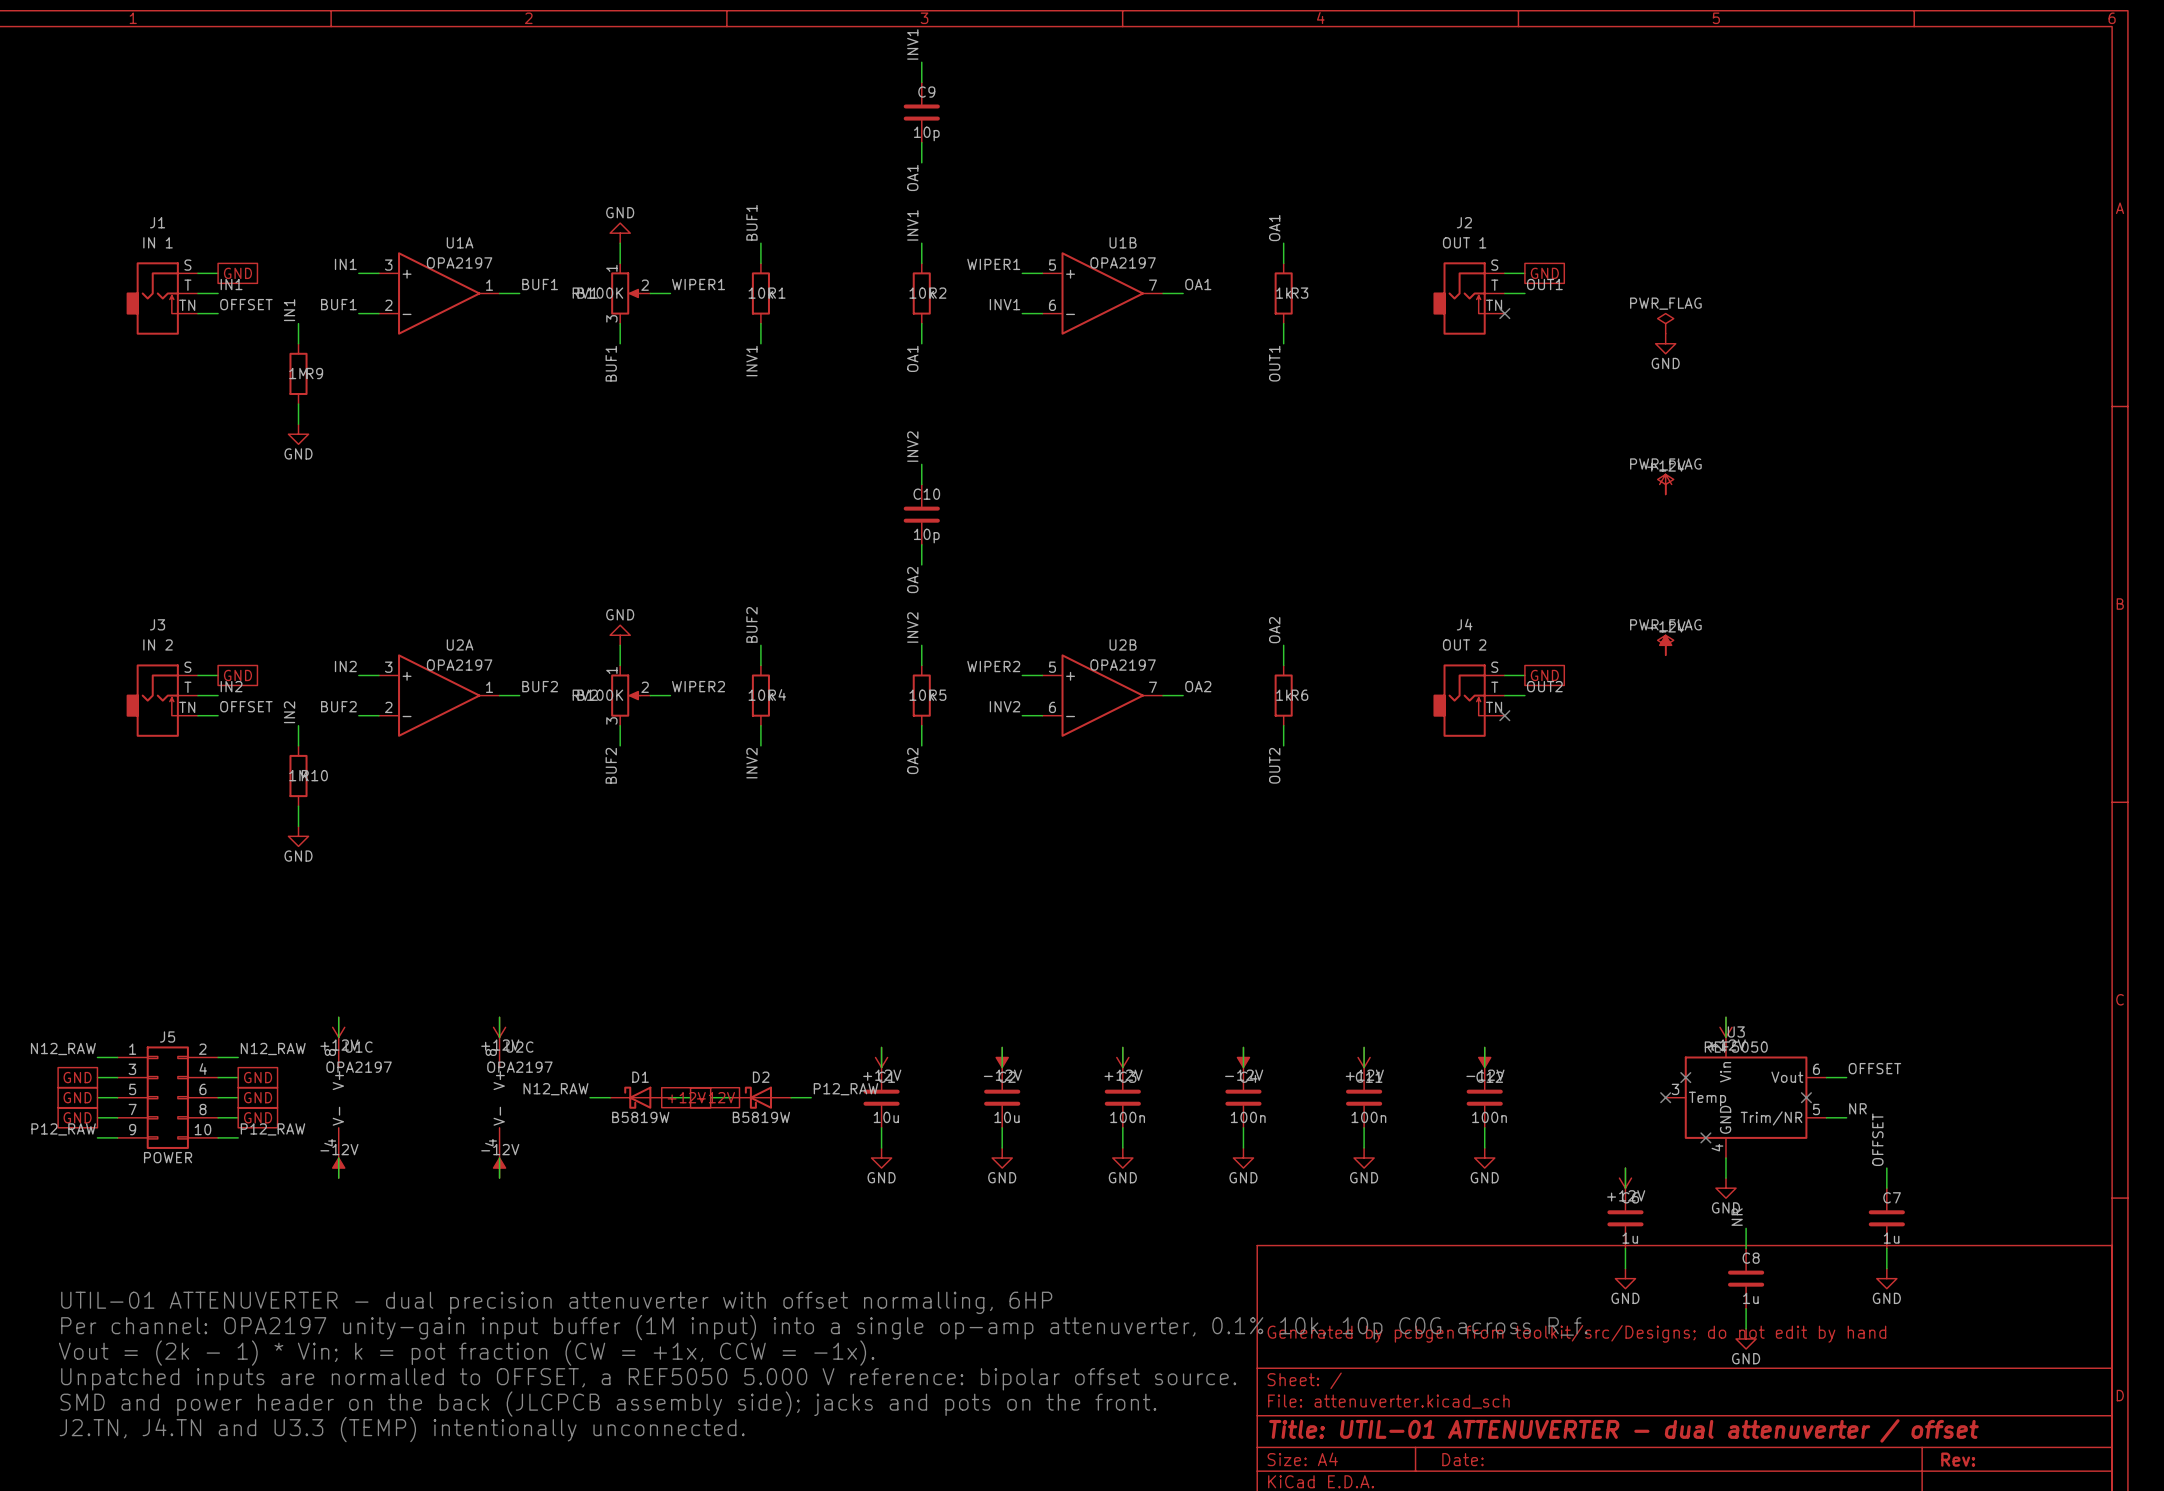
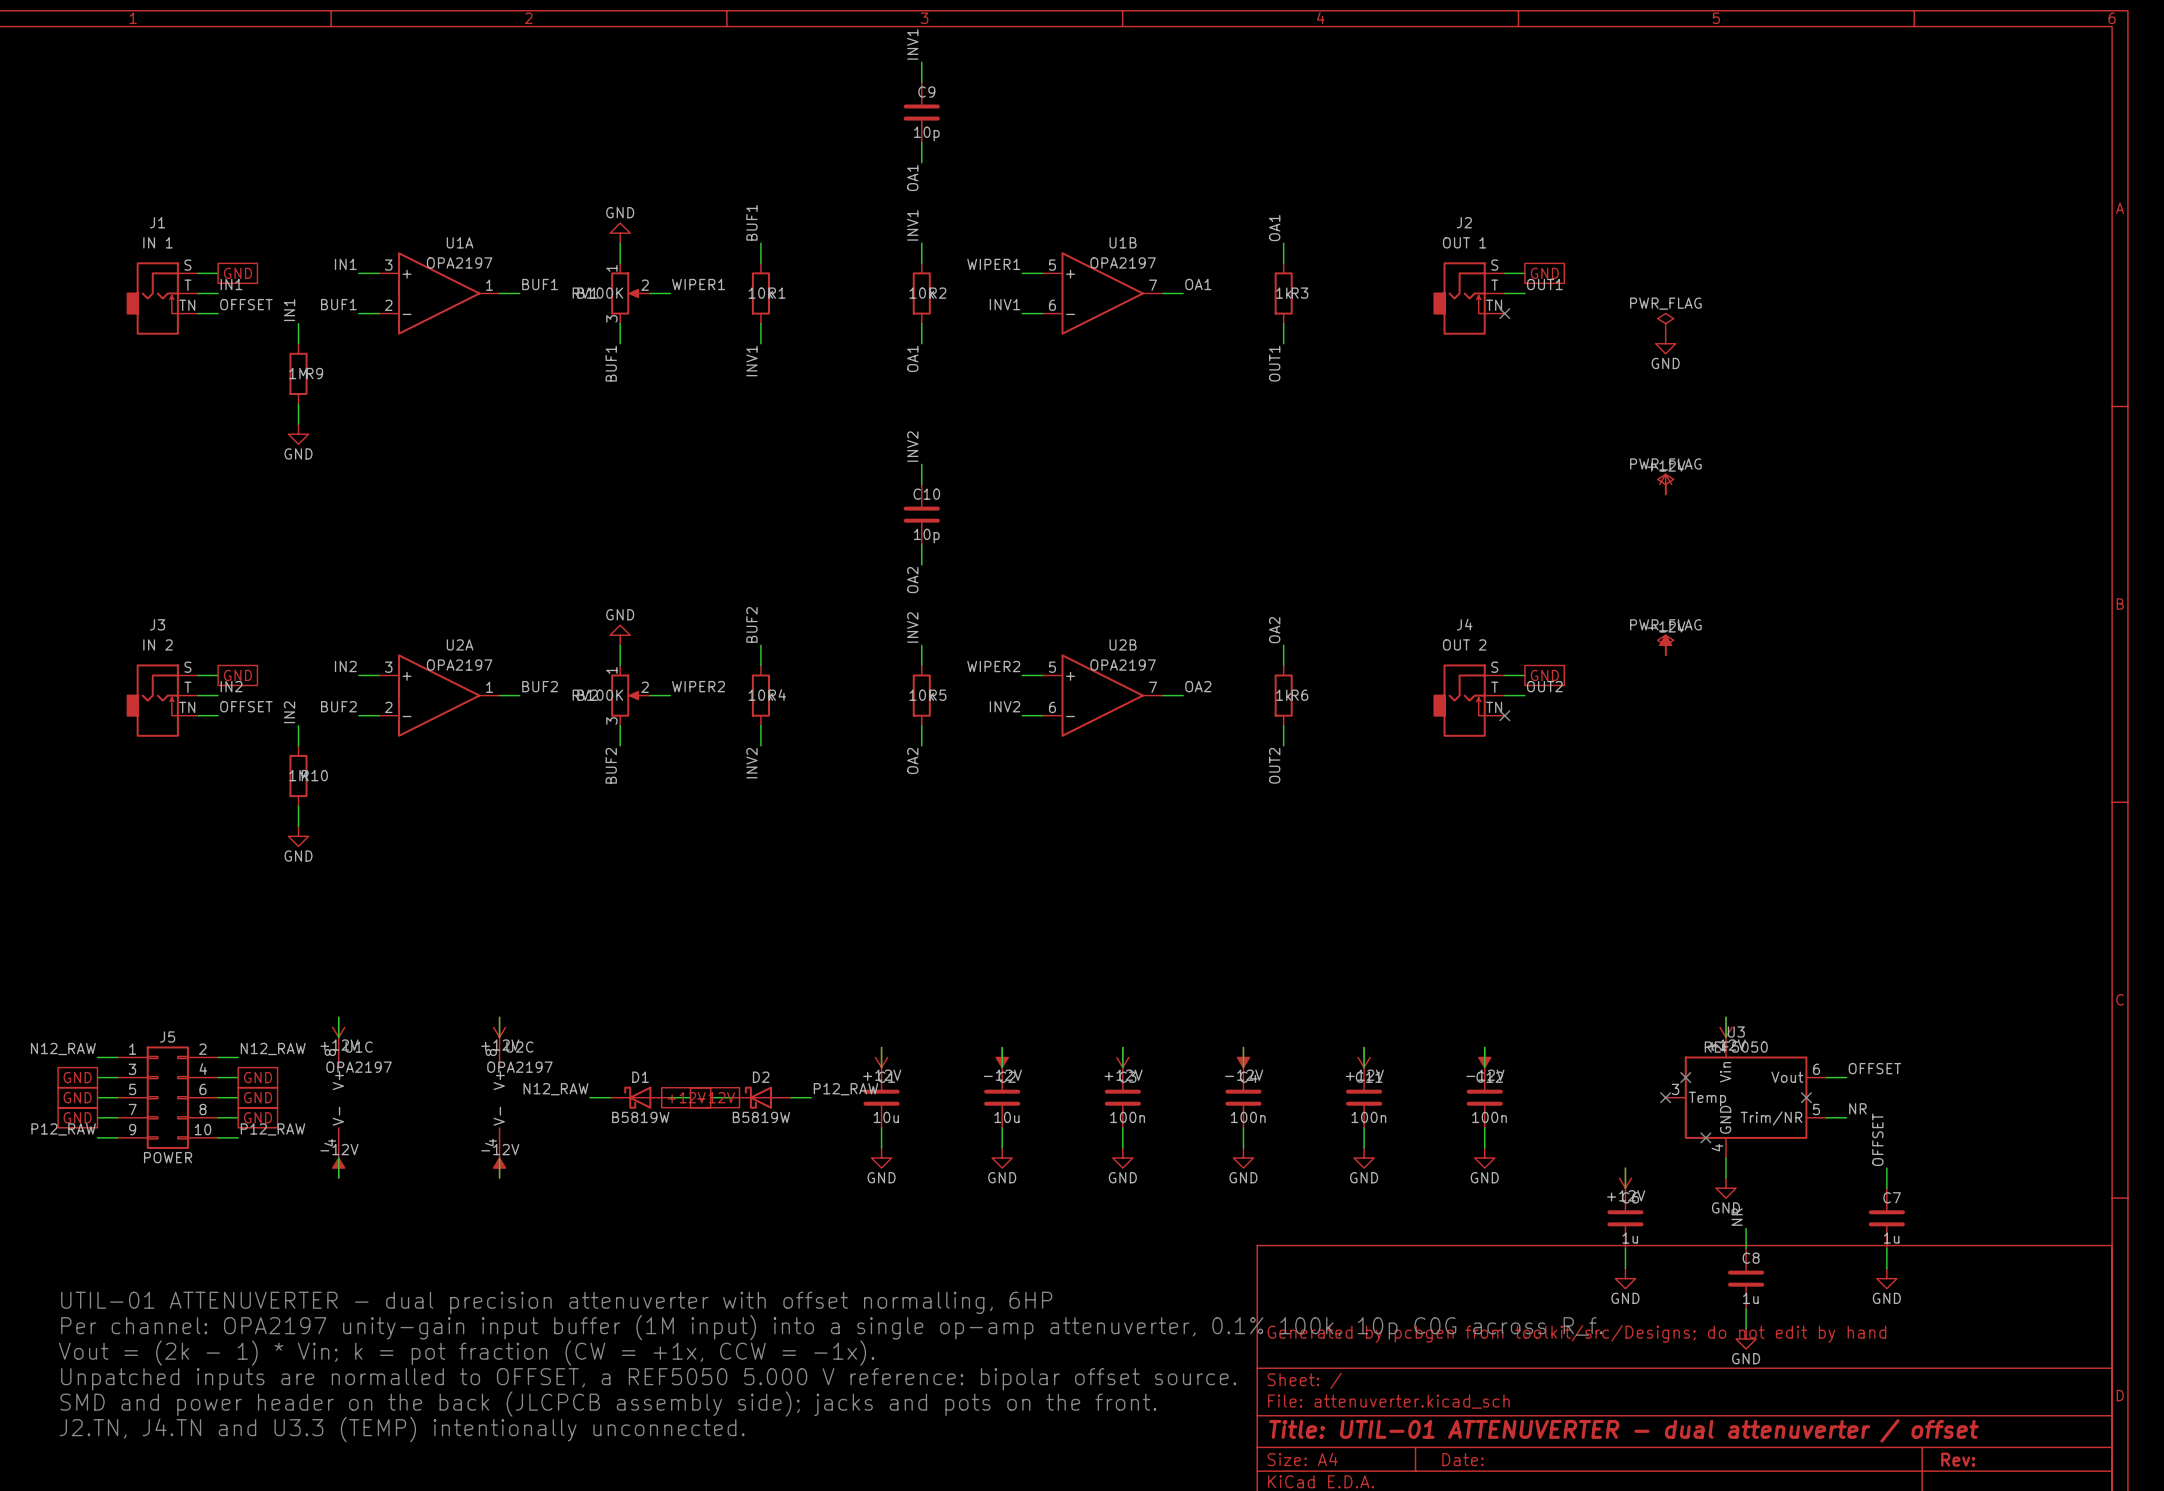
text: Per channel: OPA2197 unity-gain input buffer (1M input) into a single op-amp attenuverter, 0.1% 10k, 10p C0G across R_f. (824, 1327) -> Per channel: OPA2197 unity-gain input buffer (1M input) into a single op-amp attenuverter, 0.1% 100k, 10p C0G across R_f. (831, 1327)

